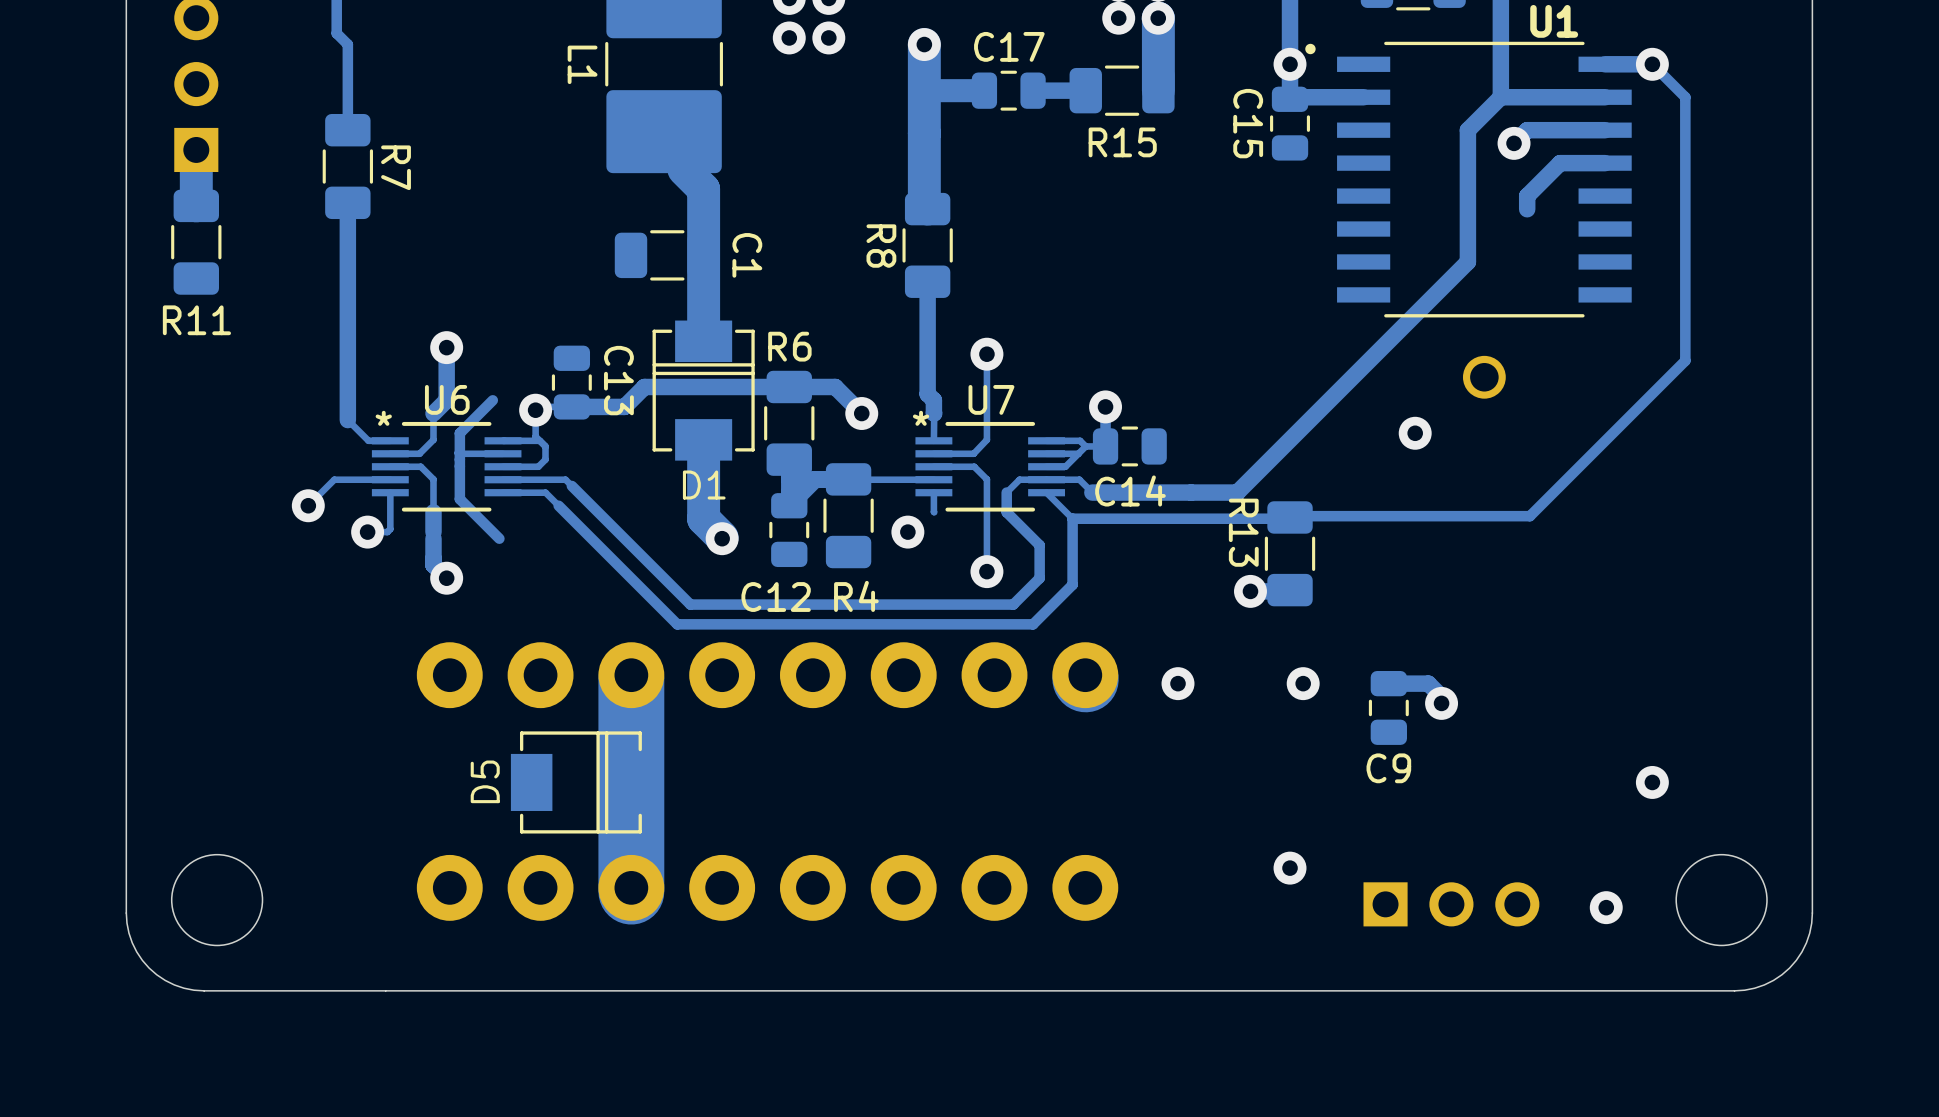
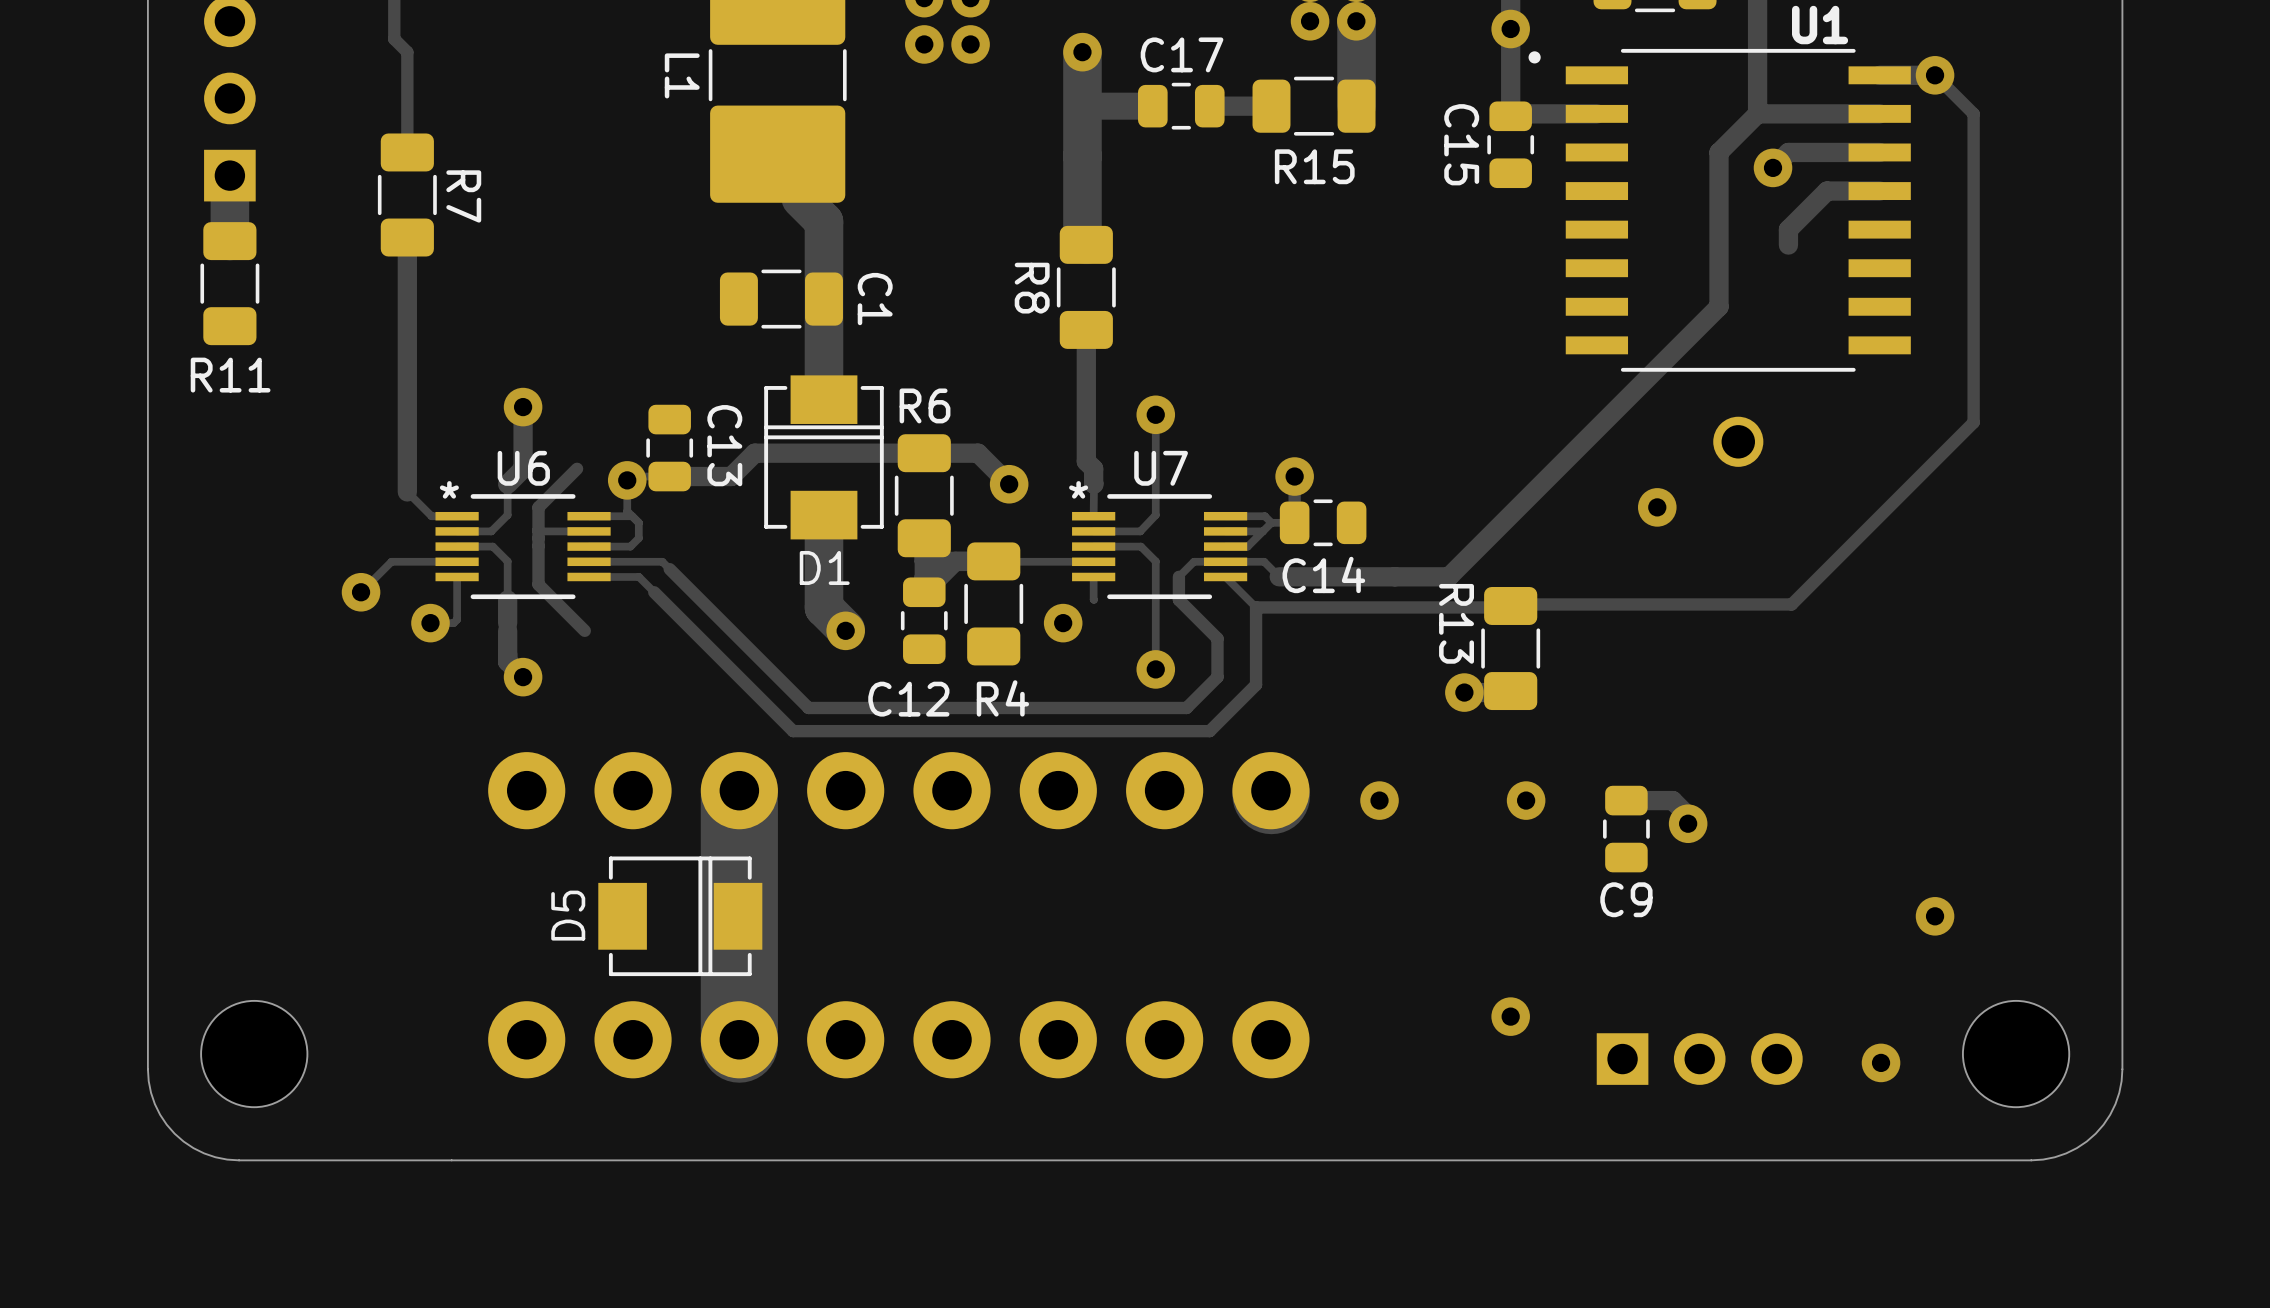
via position: (1290, 64) -> (1510, 29)

